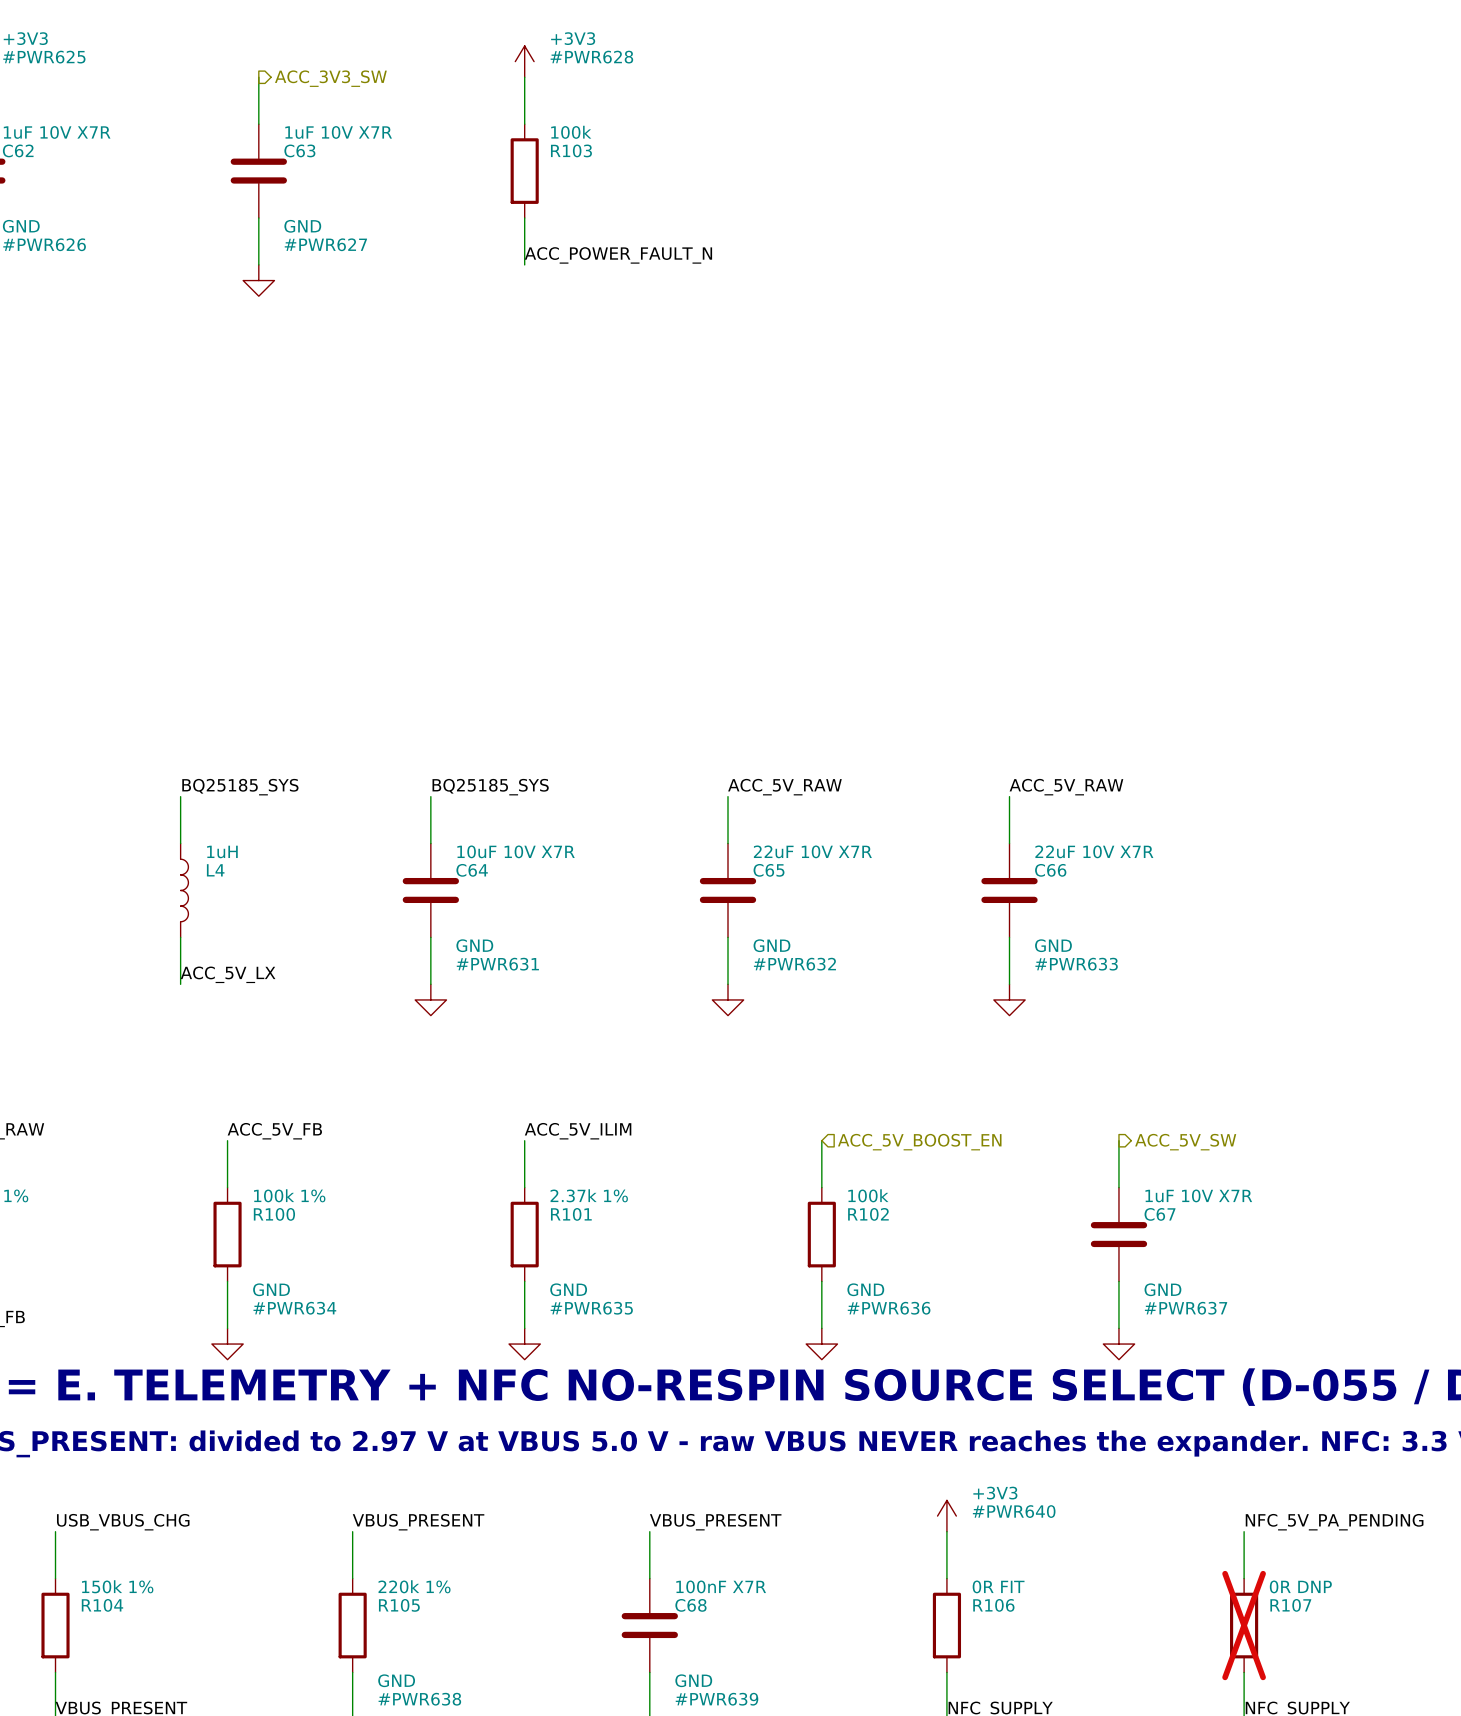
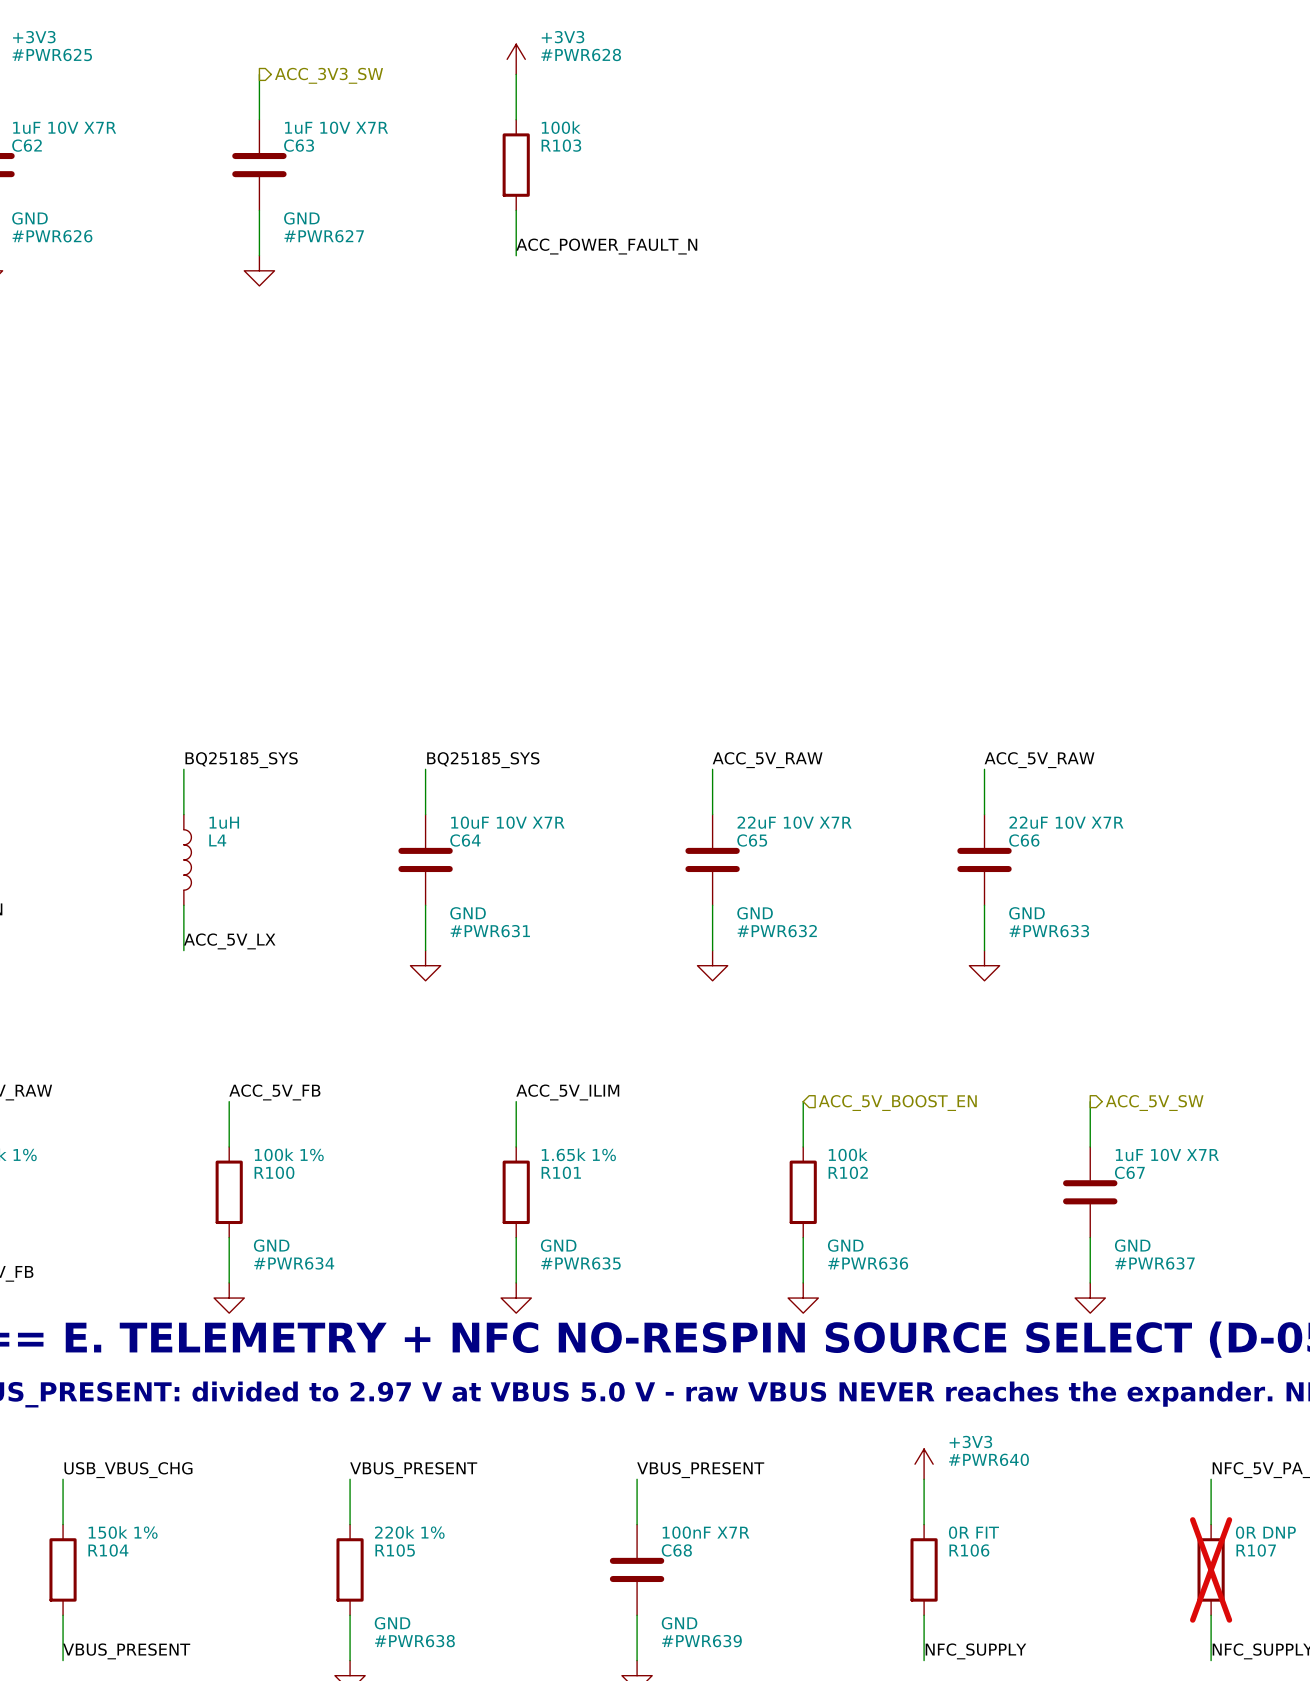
R101 value: 2.37k 1% (589, 1195) -> 1.65k 1% (578, 1154)

